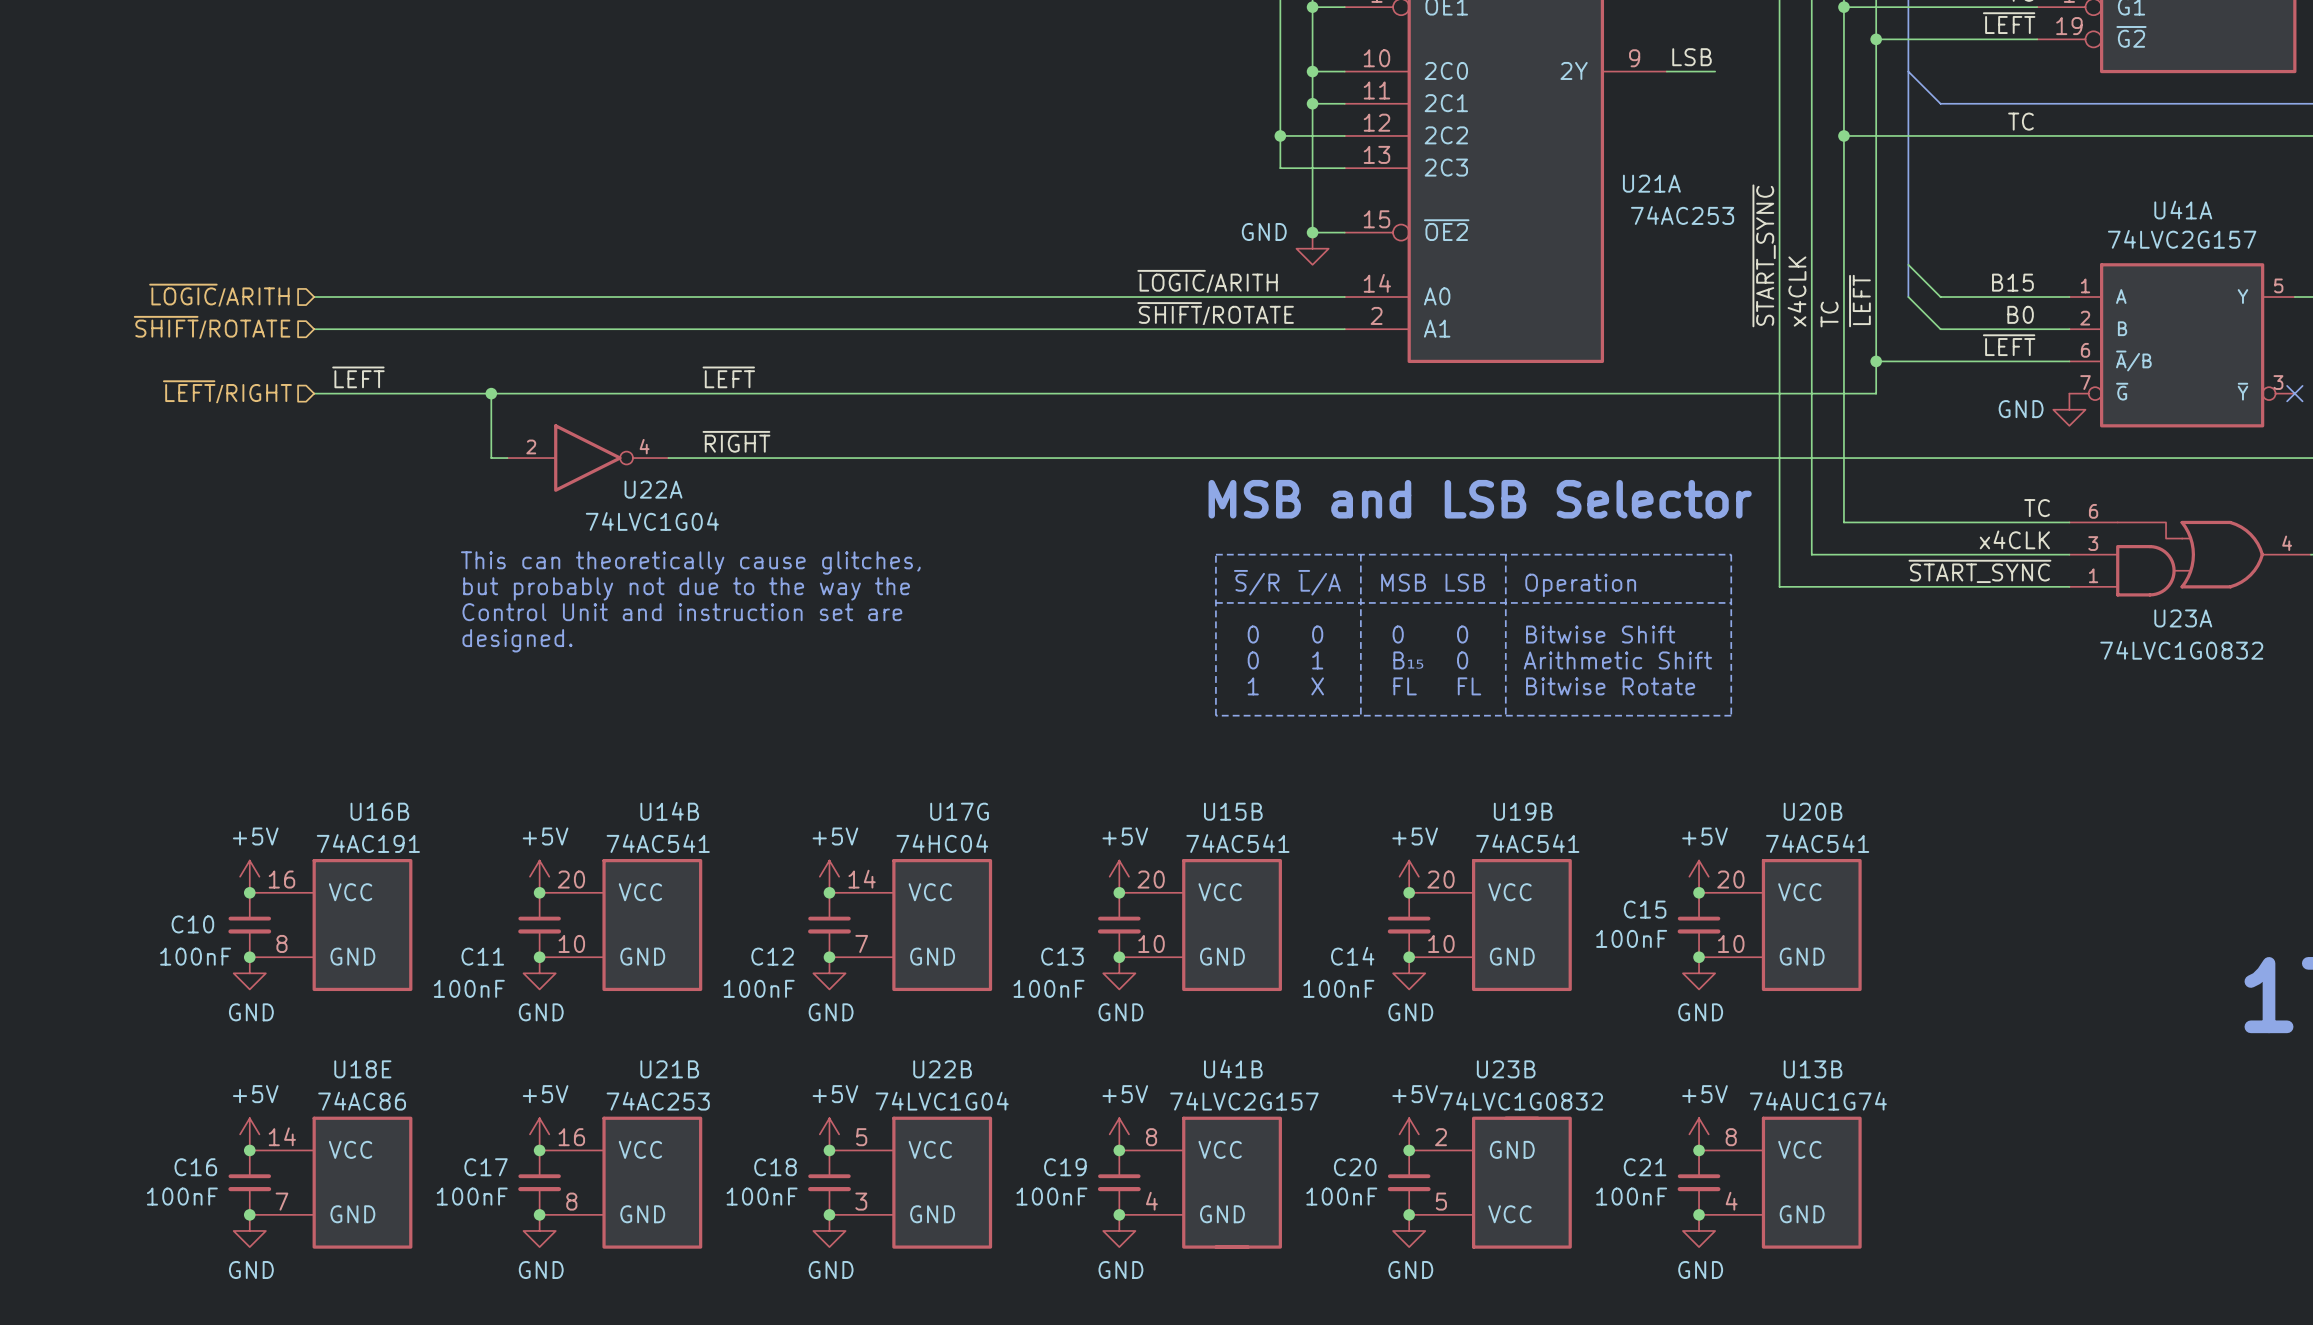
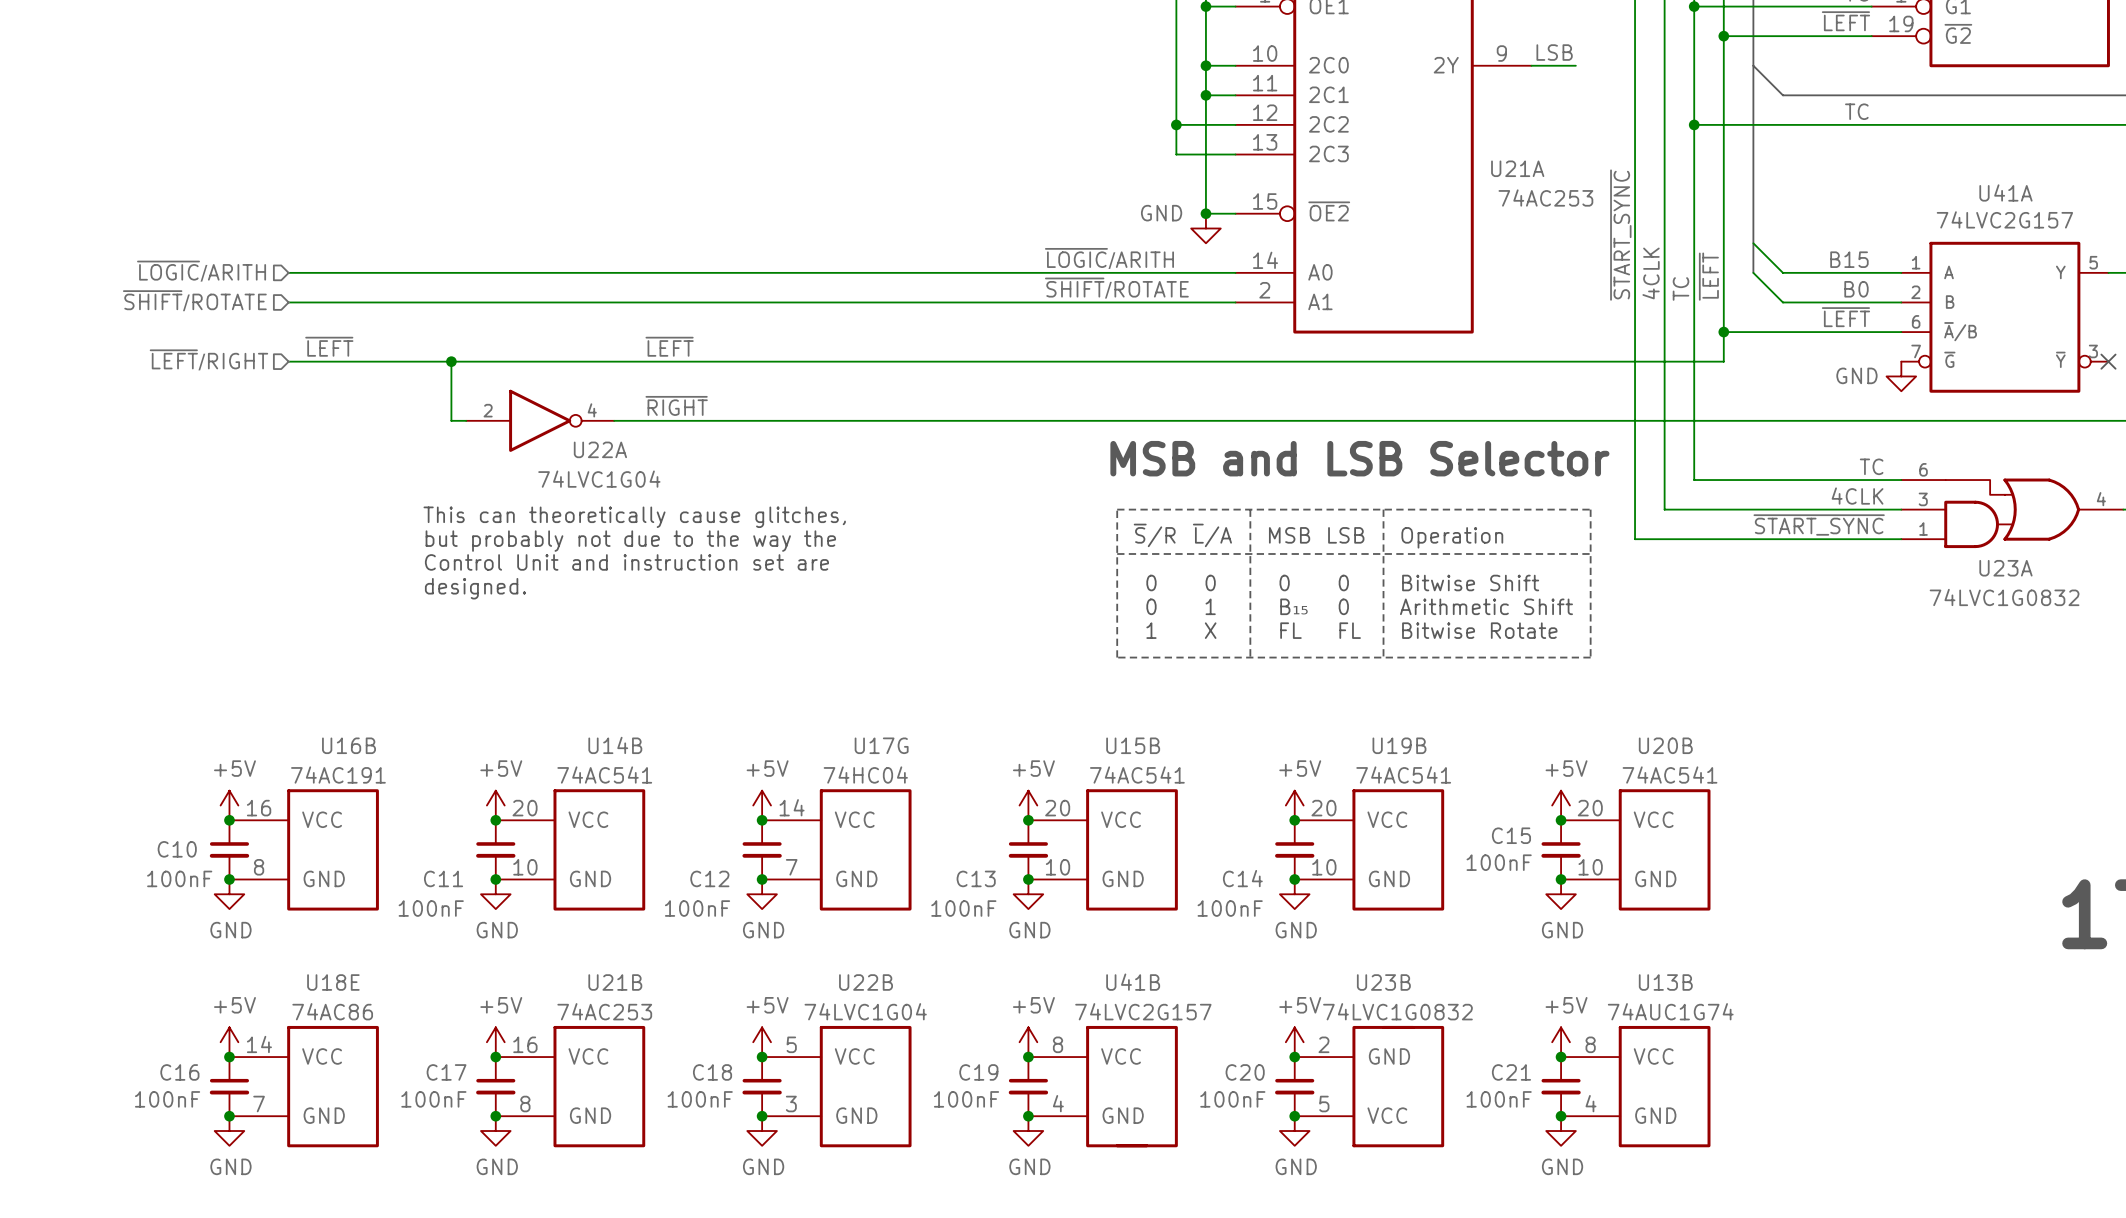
label: x4CLK (1797, 291) -> 4CLK (1651, 273)
label: x4CLK (2014, 539) -> 4CLK (1857, 496)

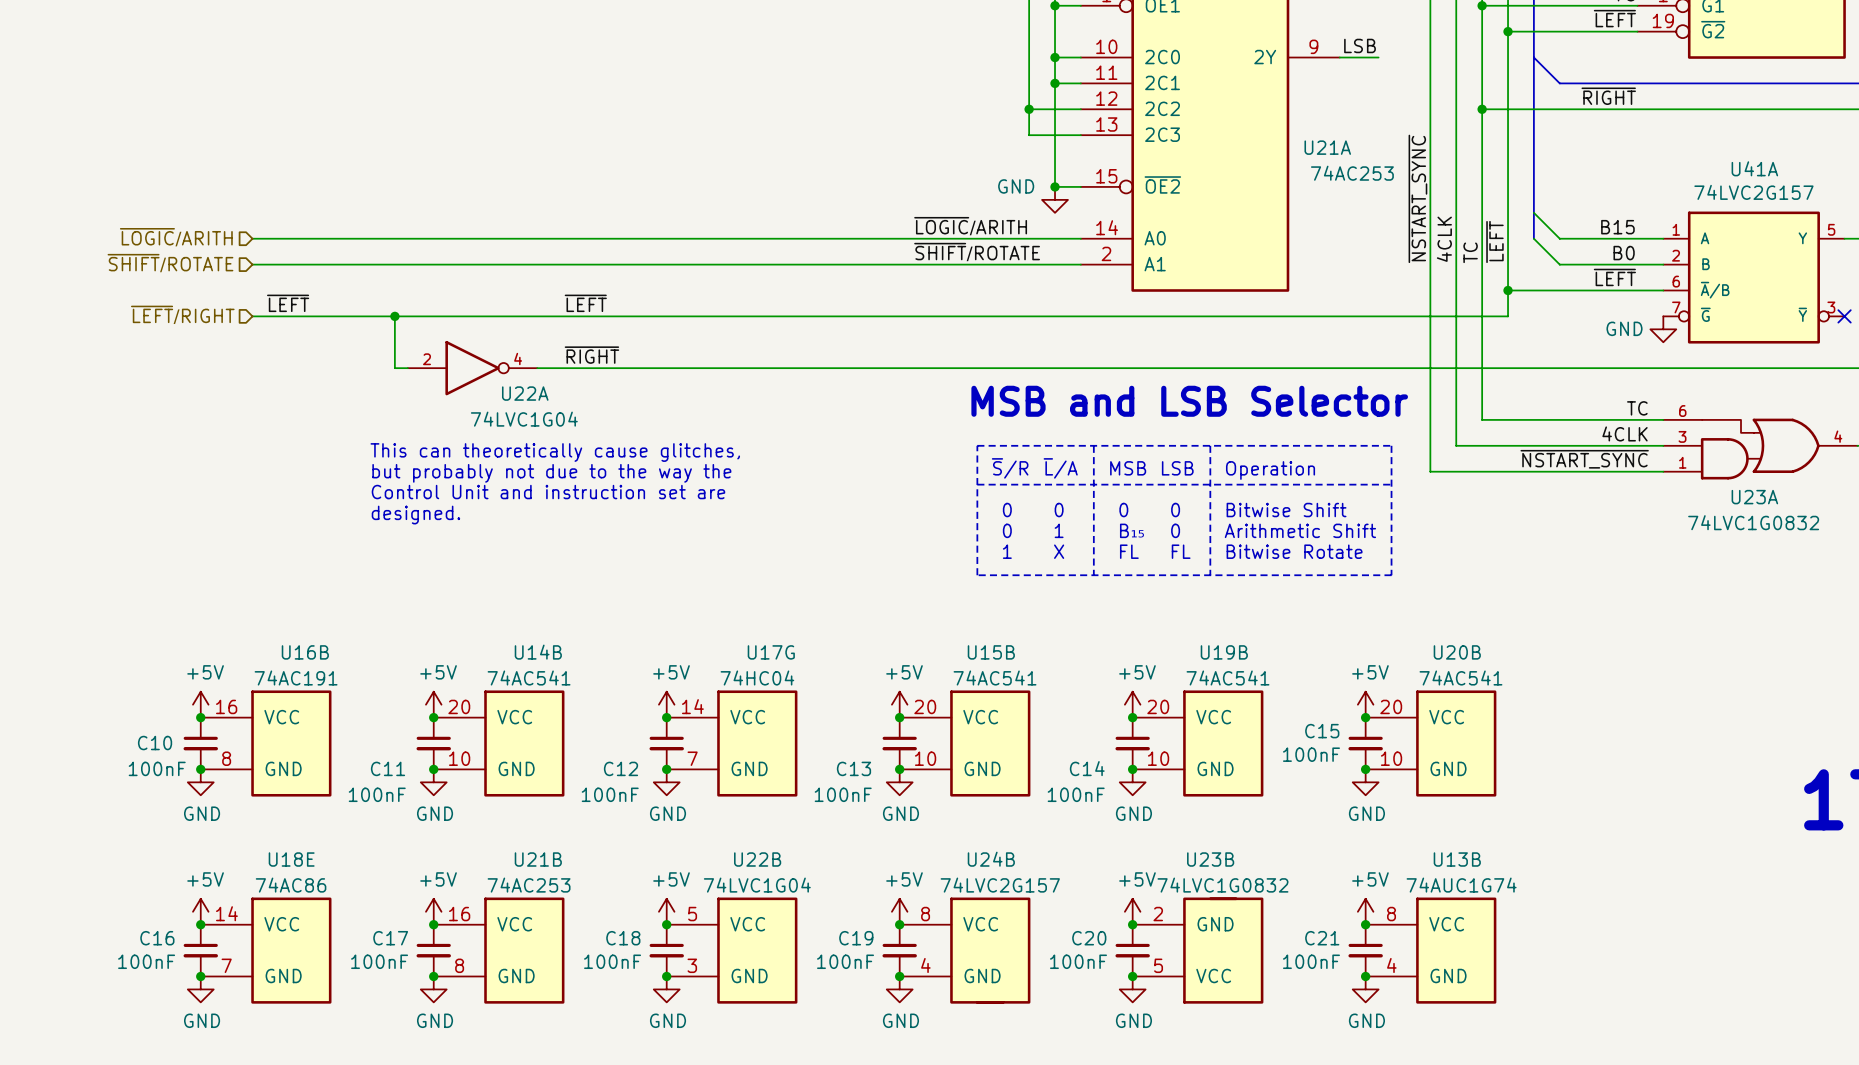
label: TC (1856, 111) -> ~{RIGHT} (1608, 96)
label: ~{START_SYNC} (1620, 235) -> ~{NSTART_SYNC} (1417, 198)
label: ~{START_SYNC} (1819, 524) -> ~{NSTART_SYNC} (1584, 459)
U41B name: U41B (1133, 982) -> U24B (991, 859)

